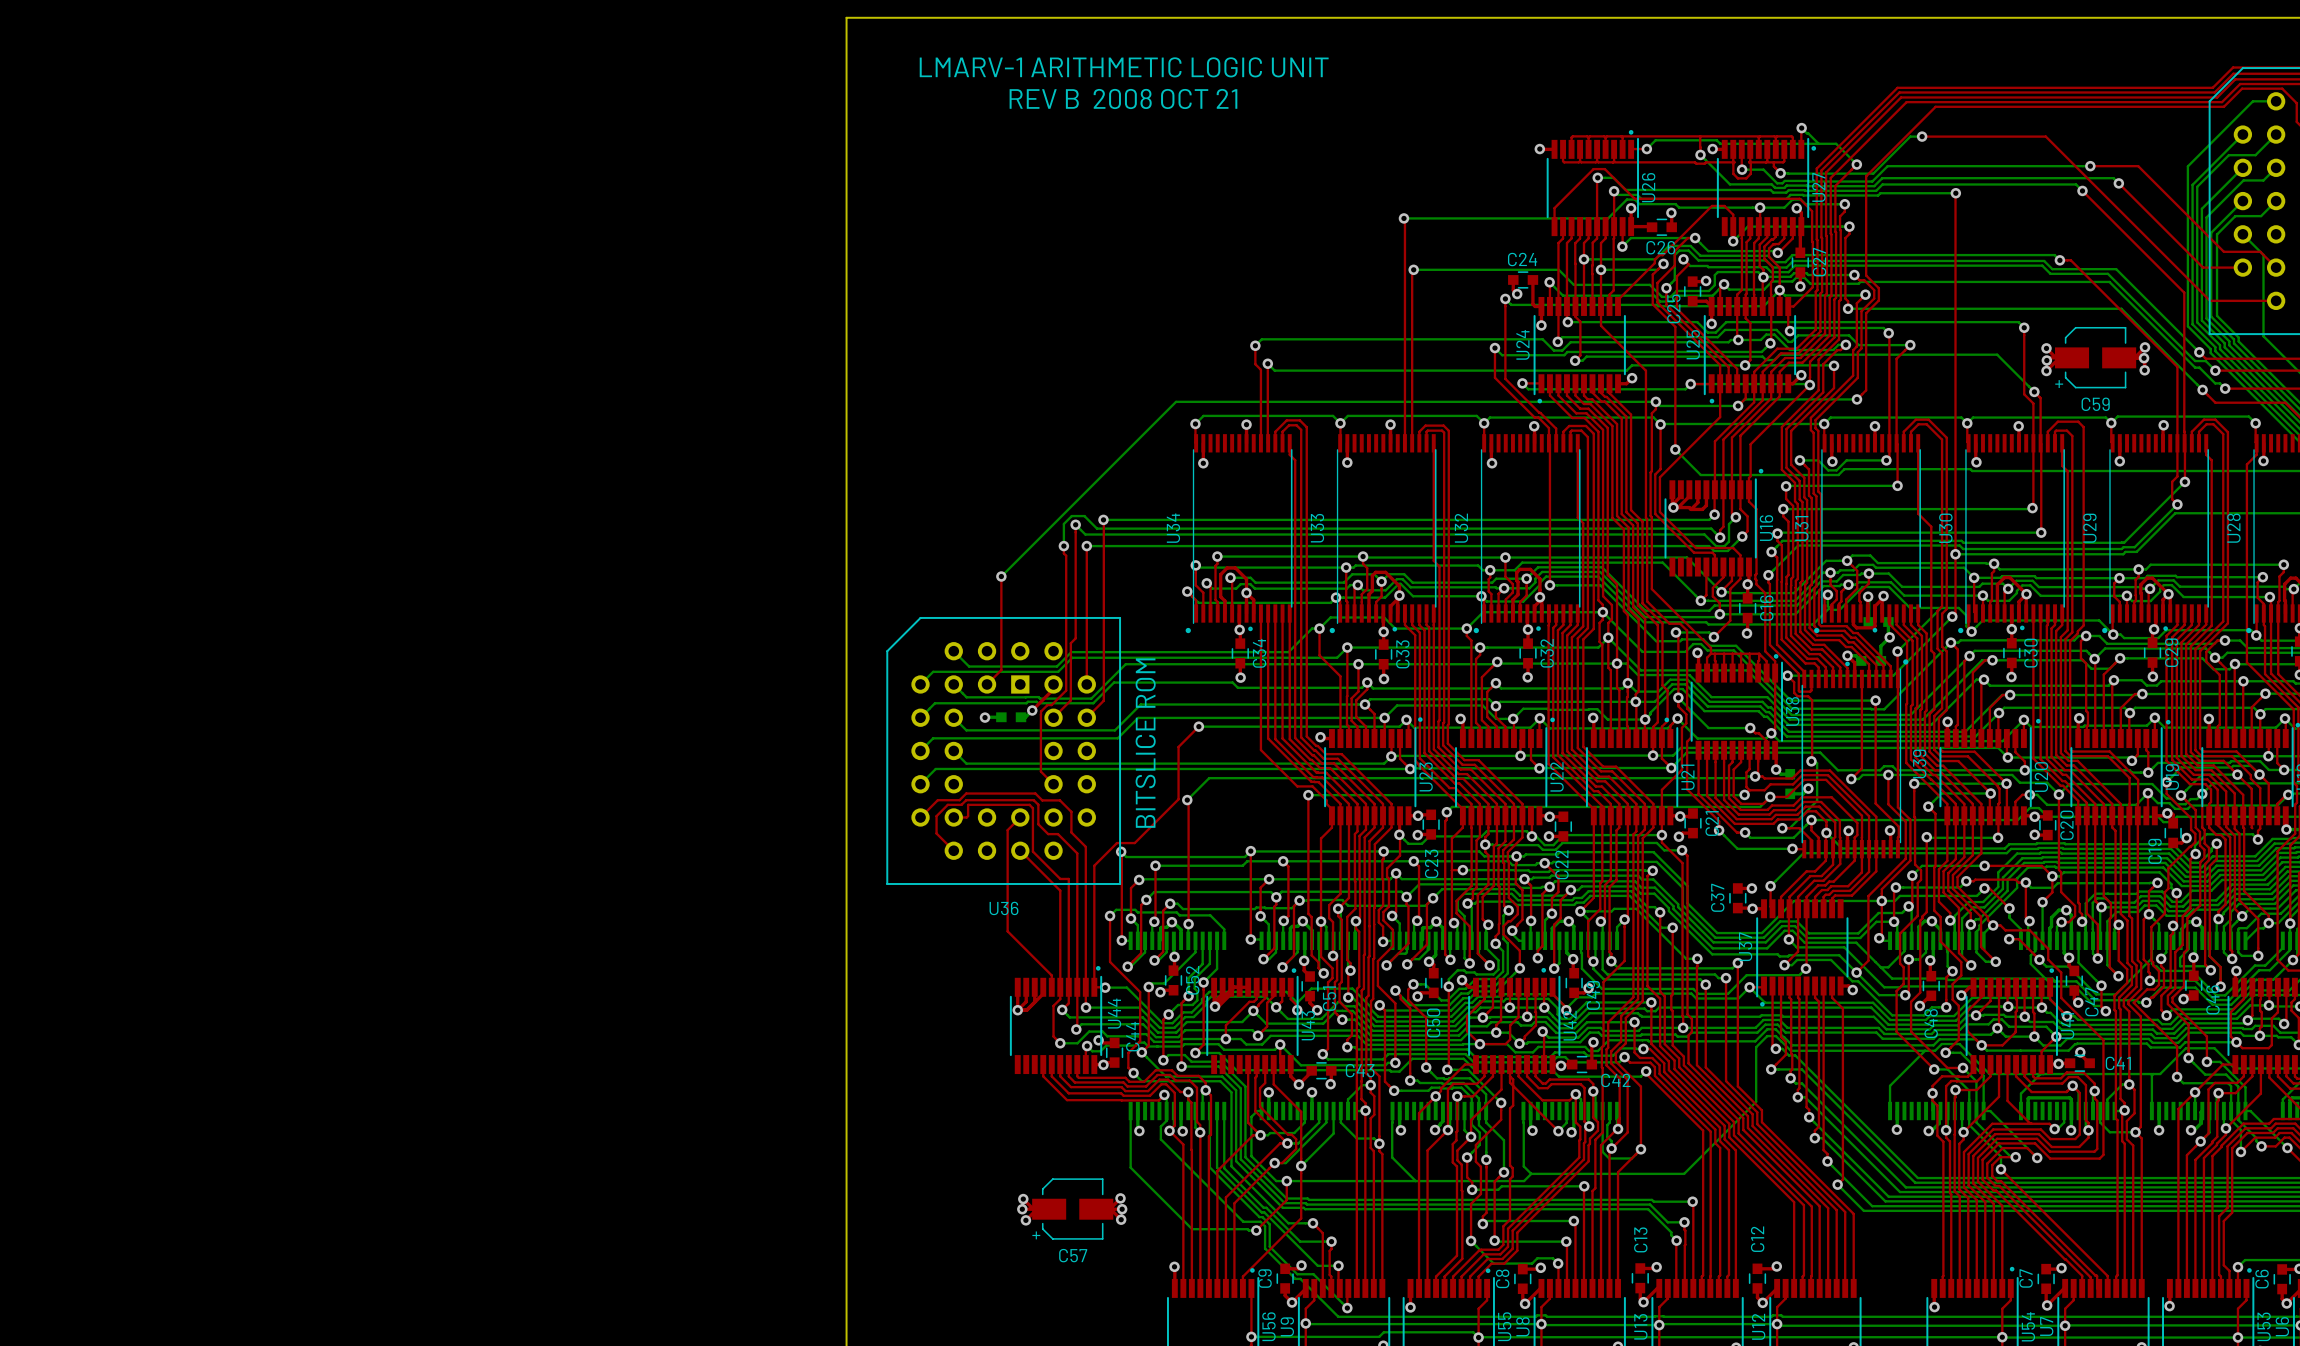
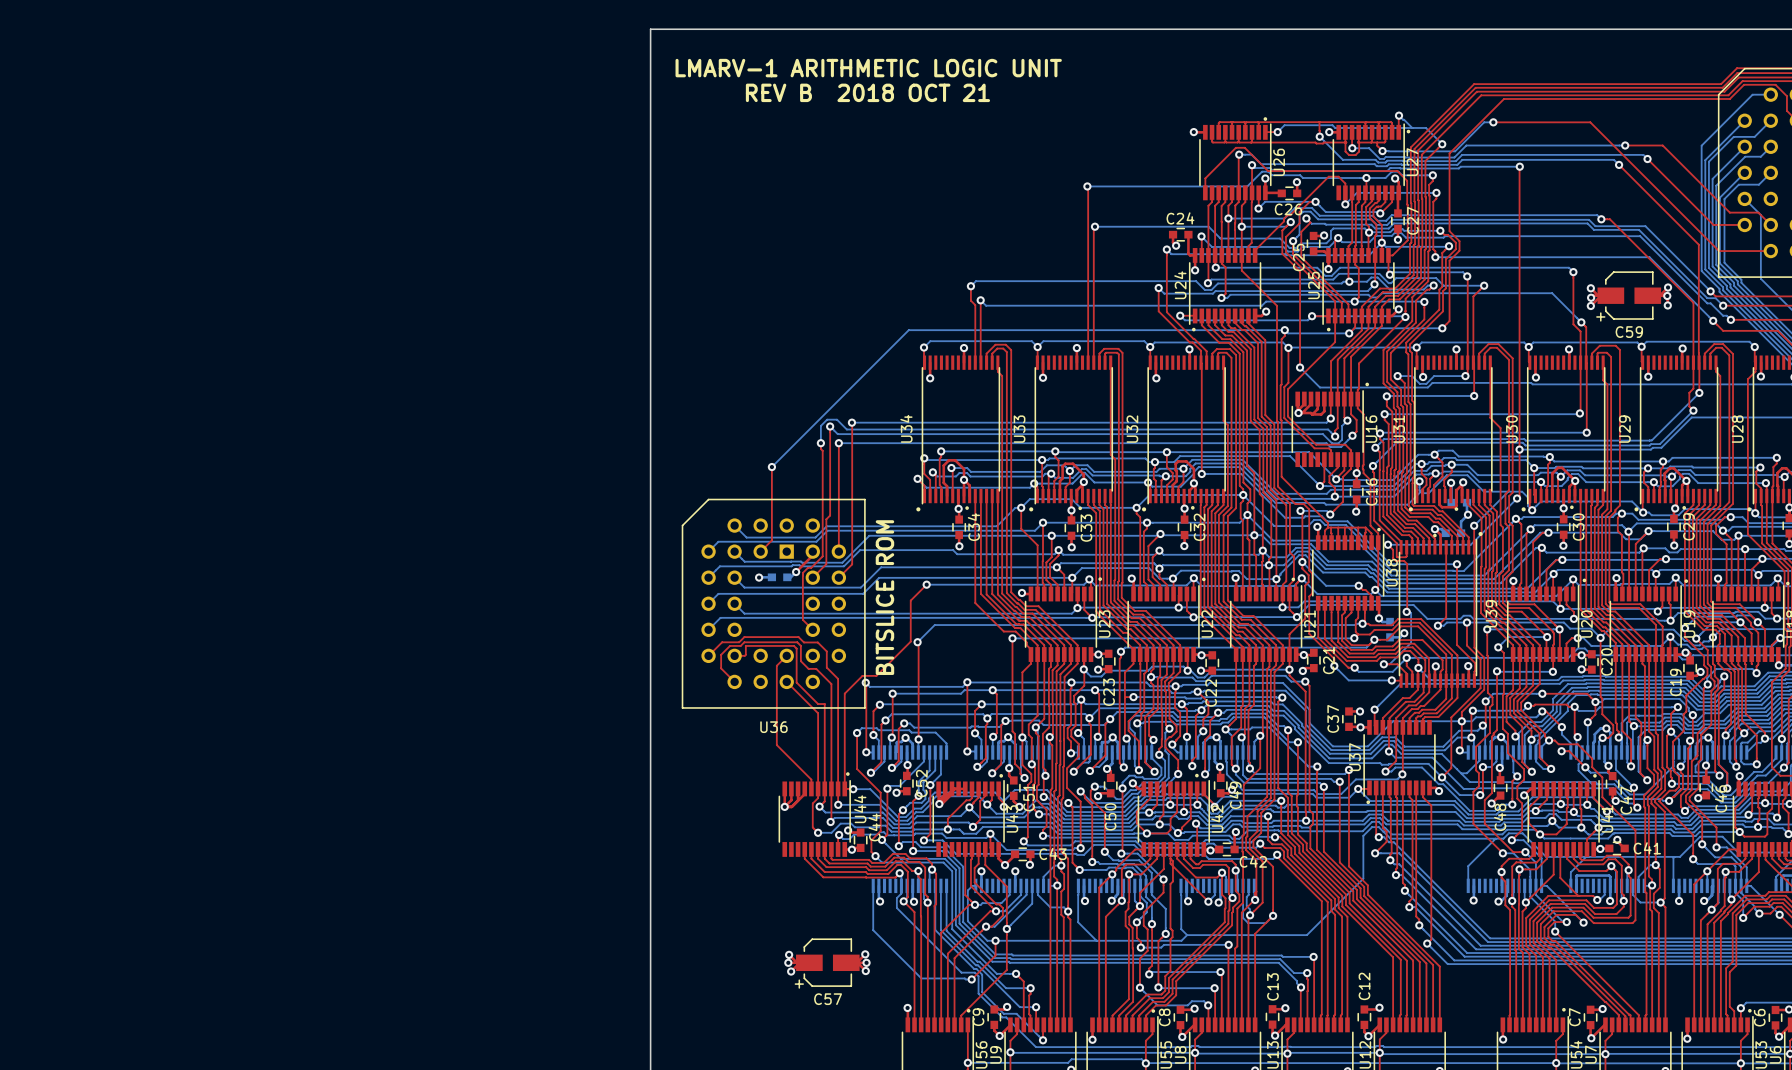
text: REV B 2008 OCT 21 (1123, 98) -> REV B 2018 OCT 21 (867, 92)

